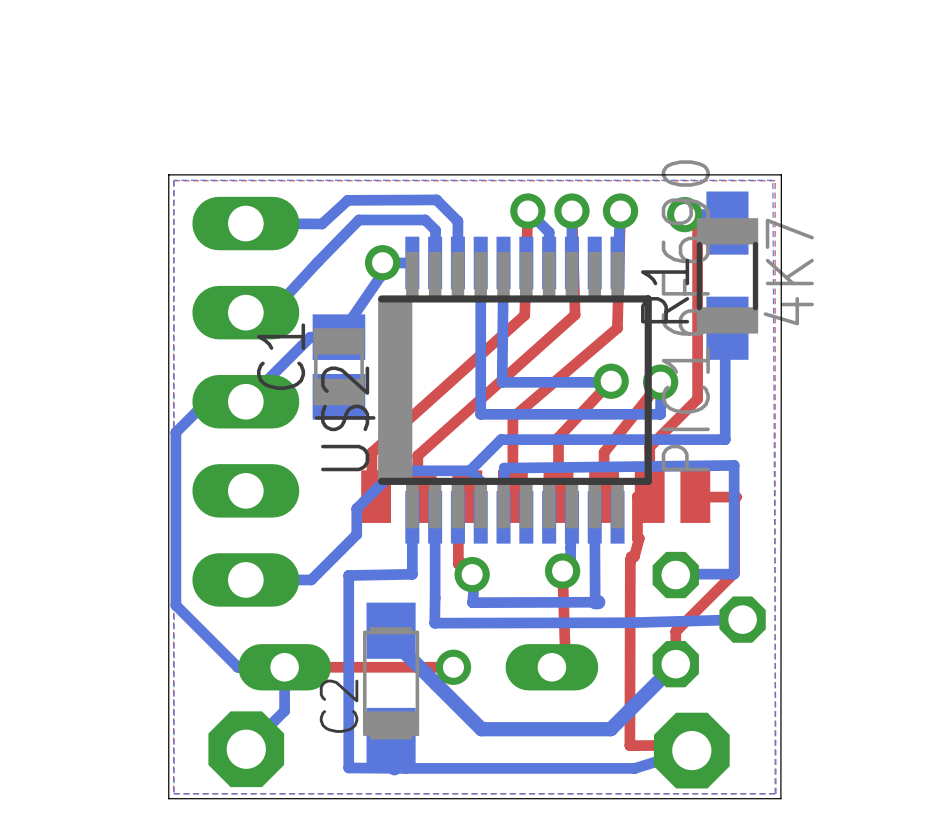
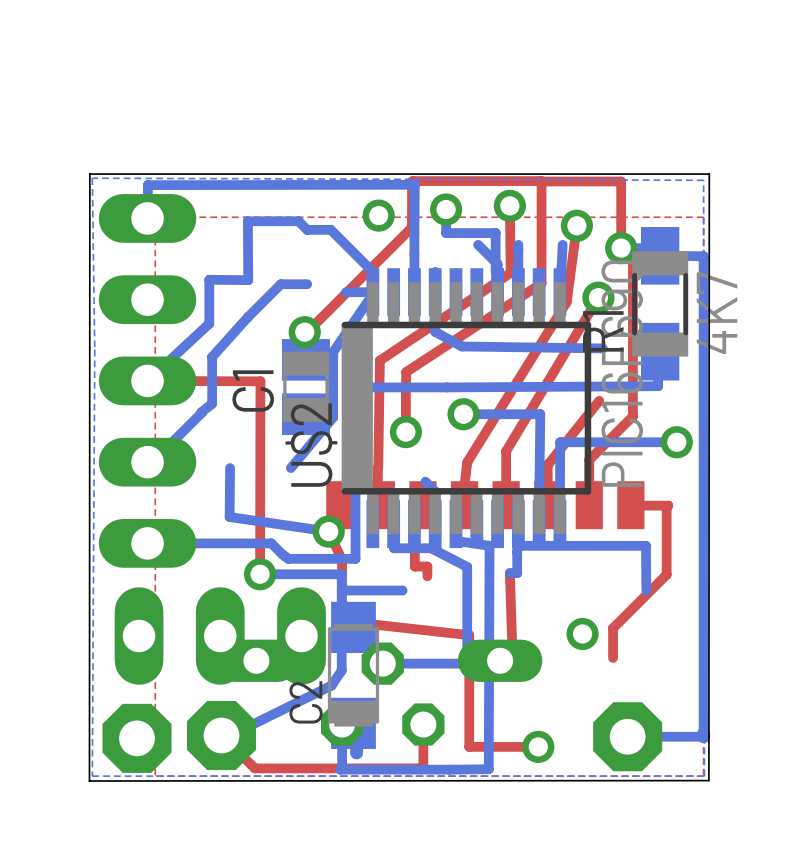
top track: none -> (541, 181) (412, 181) (411, 227) (307, 332) (304, 332)
via: none -> (509, 205)
bottom track: none -> (446, 209) (446, 233) (495, 233) (495, 271) (497, 271)
via: none -> (446, 209)
board edge: (781, 174) (168, 174) (168, 798) (780, 798) -> (709, 211) (709, 174) (89, 174) (89, 781) (708, 780)
via: none -> (378, 215)
top track: none -> (576, 225) (566, 302) (467, 461) (464, 484)
top track: (617, 208) (620, 211) (617, 328) (512, 417) (512, 496) -> none
top track: (527, 211) (524, 315) (371, 452) (371, 494) (376, 494) (376, 496) -> none
via: (527, 211) -> none
top track: (571, 211) (575, 314) (417, 455) -> (509, 205) (510, 272) (379, 360) (378, 467)
via: (571, 211) -> none
via position: (620, 211) -> (576, 225)
top track: none -> (621, 248) (621, 181) (541, 181) (541, 283) (406, 371) (405, 432)
bottom track: (457, 221) (436, 199) (347, 200) (322, 223) (245, 223) -> (414, 254) (414, 184) (147, 185) (147, 218)
bottom track: none -> (307, 284) (280, 284) (212, 357) (212, 403) (152, 462) (147, 462)
bottom track: (382, 262) (382, 273) (338, 337) (310, 337) (245, 402) (206, 402) (175, 432) (175, 605) (237, 667) (284, 667) (284, 710) (246, 749) -> none
via: (382, 262) -> none
bottom track: (435, 262) (435, 230) (425, 219) (359, 219) (270, 313) (245, 312) -> none
bottom track: (503, 262) (502, 382) (611, 381) -> none
via: none -> (598, 297)
via: none -> (304, 332)
bottom track: (480, 306) (480, 414) (660, 414) (660, 382) -> (435, 331) (461, 346) (602, 348)
bottom track: none -> (147, 380) (209, 323) (209, 279) (248, 280) (247, 221) (298, 221) (307, 229) (330, 229) (372, 271) (372, 295) (333, 352) (333, 417) (290, 468)
top track: none -> (147, 380) (260, 381) (260, 574)
bottom track: (725, 366) (725, 439) (501, 439) (469, 470) (394, 470) (356, 508) (356, 534) (311, 579) (245, 579) -> (658, 386) (355, 387) (355, 558) (288, 558) (271, 543) (147, 543)
top track: (611, 381) (558, 437) -> (598, 297) (506, 451)
via: (611, 381) -> none
via: (660, 382) -> none
via: none -> (463, 414)
part position: (245, 401) -> (147, 380)
via: none -> (405, 432)
bottom track: none -> (676, 442) (560, 442) (559, 503)
via: none -> (676, 442)
bottom track: none -> (230, 468) (229, 516) (328, 531)
top track: (649, 474) (649, 496) (637, 496) (637, 538) (639, 538) (634, 556) (631, 556) (630, 559) (629, 745) (691, 745) (691, 750) (691, 747) -> none
bottom track: none -> (393, 503) (394, 548) (431, 548) (467, 566) (467, 662) (382, 663)
bottom track: none -> (456, 504) (456, 540) (489, 545) (488, 769) (340, 769) (342, 768) (342, 724)
bottom track: none -> (518, 503) (517, 545) (645, 545) (646, 590)
bottom track: (412, 517) (412, 574) (348, 575) (348, 767) (634, 768) (691, 750) -> (660, 255) (703, 256) (703, 736) (627, 736)
bottom track: (435, 517) (434, 623) (630, 622) (742, 619) -> none
bottom track: (503, 517) (504, 468) (734, 465) (734, 574) (675, 574) -> none
bottom track: (594, 517) (595, 602) (598, 602) (472, 602) (475, 571) (472, 574) -> (539, 524) (540, 414) (463, 414)
top track: none -> (328, 531) (342, 560) (341, 620) (469, 635) (469, 746) (538, 746)
via: none -> (328, 531)
via: (562, 571) -> none
bottom track: none -> (260, 574) (341, 574) (341, 670) (331, 685) (224, 738)
via: none -> (260, 574)
via: (472, 574) -> none
bottom track: none -> (402, 590) (341, 590)
part rotation: 0° (709, 619) -> 90° counterclockwise (382, 694)
part position: (709, 619) -> (382, 694)
bottom track: (391, 630) (391, 638) (481, 729) (610, 729) (675, 664) -> none
via: none -> (582, 633)
part: none -> (220, 636)
top track: (453, 667) (284, 667) -> none
via: (453, 667) -> none
top track: none -> (423, 724) (423, 768) (254, 768) (224, 738)
part: none -> (137, 738)
via: none -> (538, 746)
bottom zone outline: (776, 793) (772, 180) (174, 180) (174, 793) -> (704, 776) (703, 180) (92, 178) (94, 349) (92, 776) (155, 776)

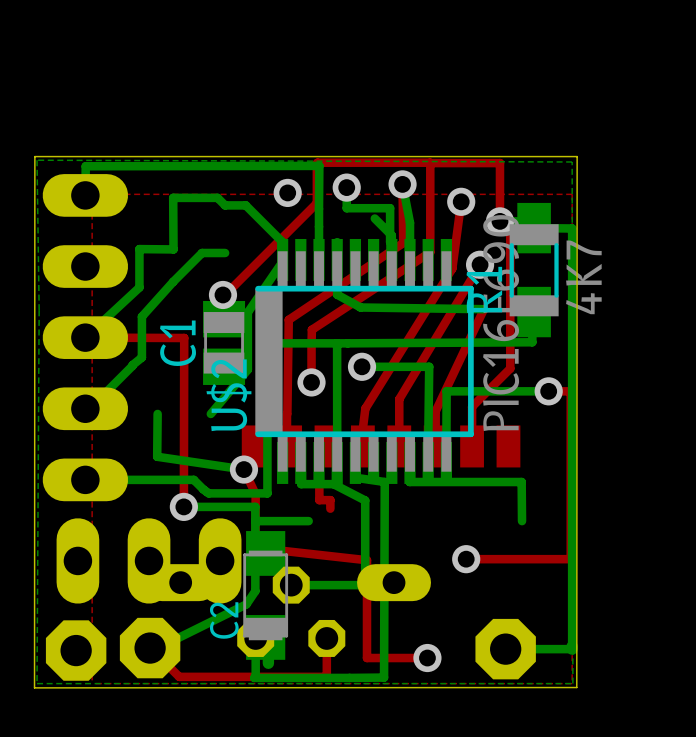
bottom track: (518, 244) (518, 249) -> (402, 184) (410, 222)
bottom track: (562, 244) (560, 291) -> none
bottom track: (372, 292) (346, 292) -> none
top track: (599, 400) (547, 465) -> (483, 309) (435, 411)
top track: none -> (548, 391) (570, 391) (570, 559) (466, 559)
bottom track: (425, 481) (435, 491) -> (337, 343) (337, 434)
top track: (631, 505) (668, 505) (666, 507) (666, 574) (613, 628) (613, 657) -> none
bottom track: (518, 524) (517, 573) (509, 573) -> none
top track: (509, 573) (512, 659) (500, 660) -> none

